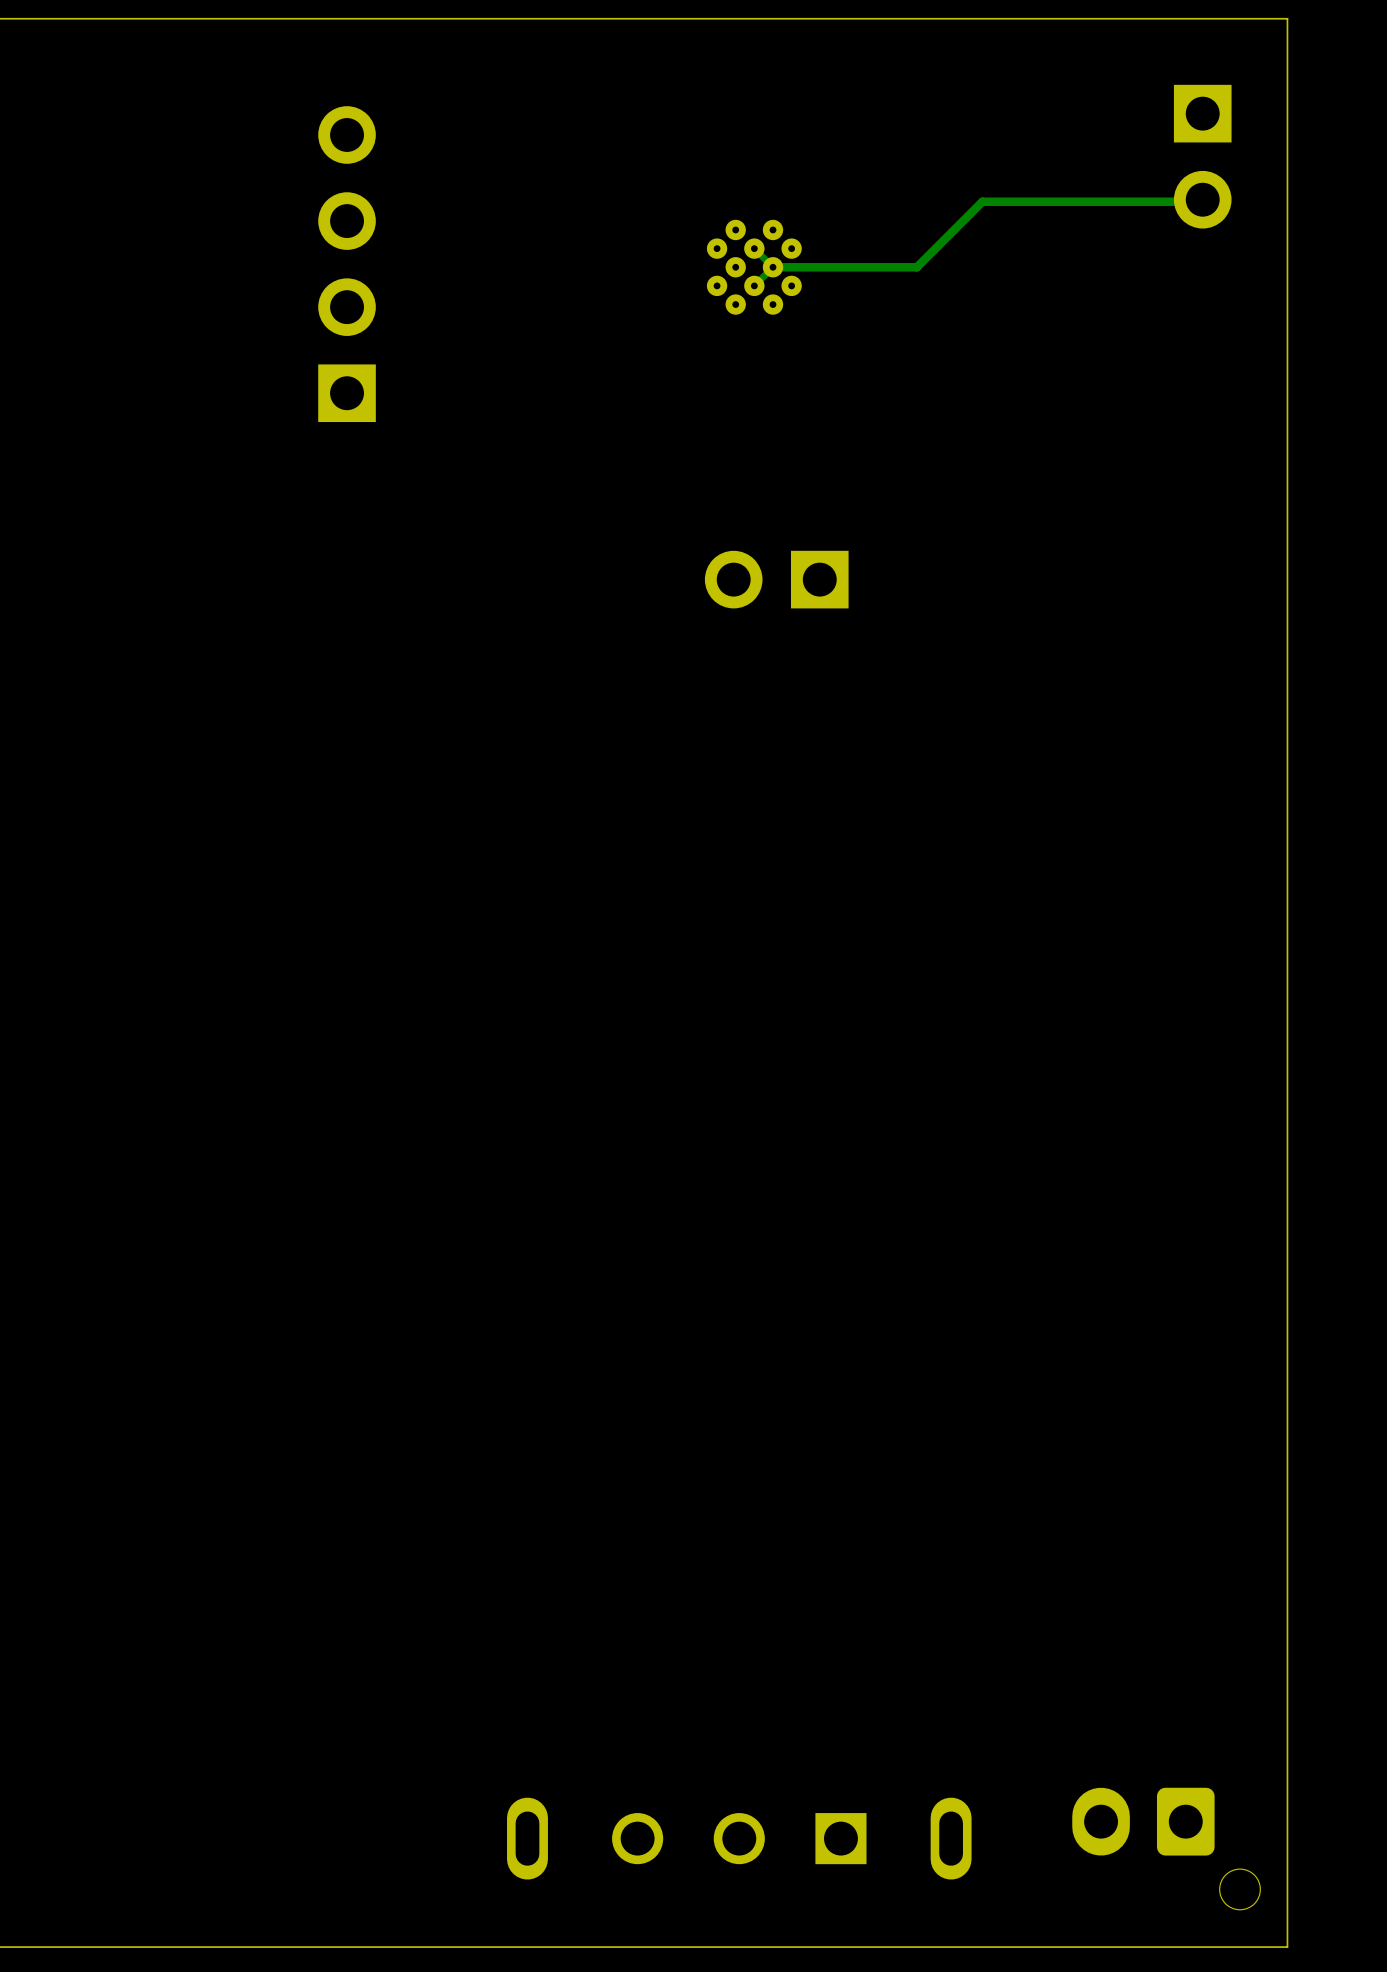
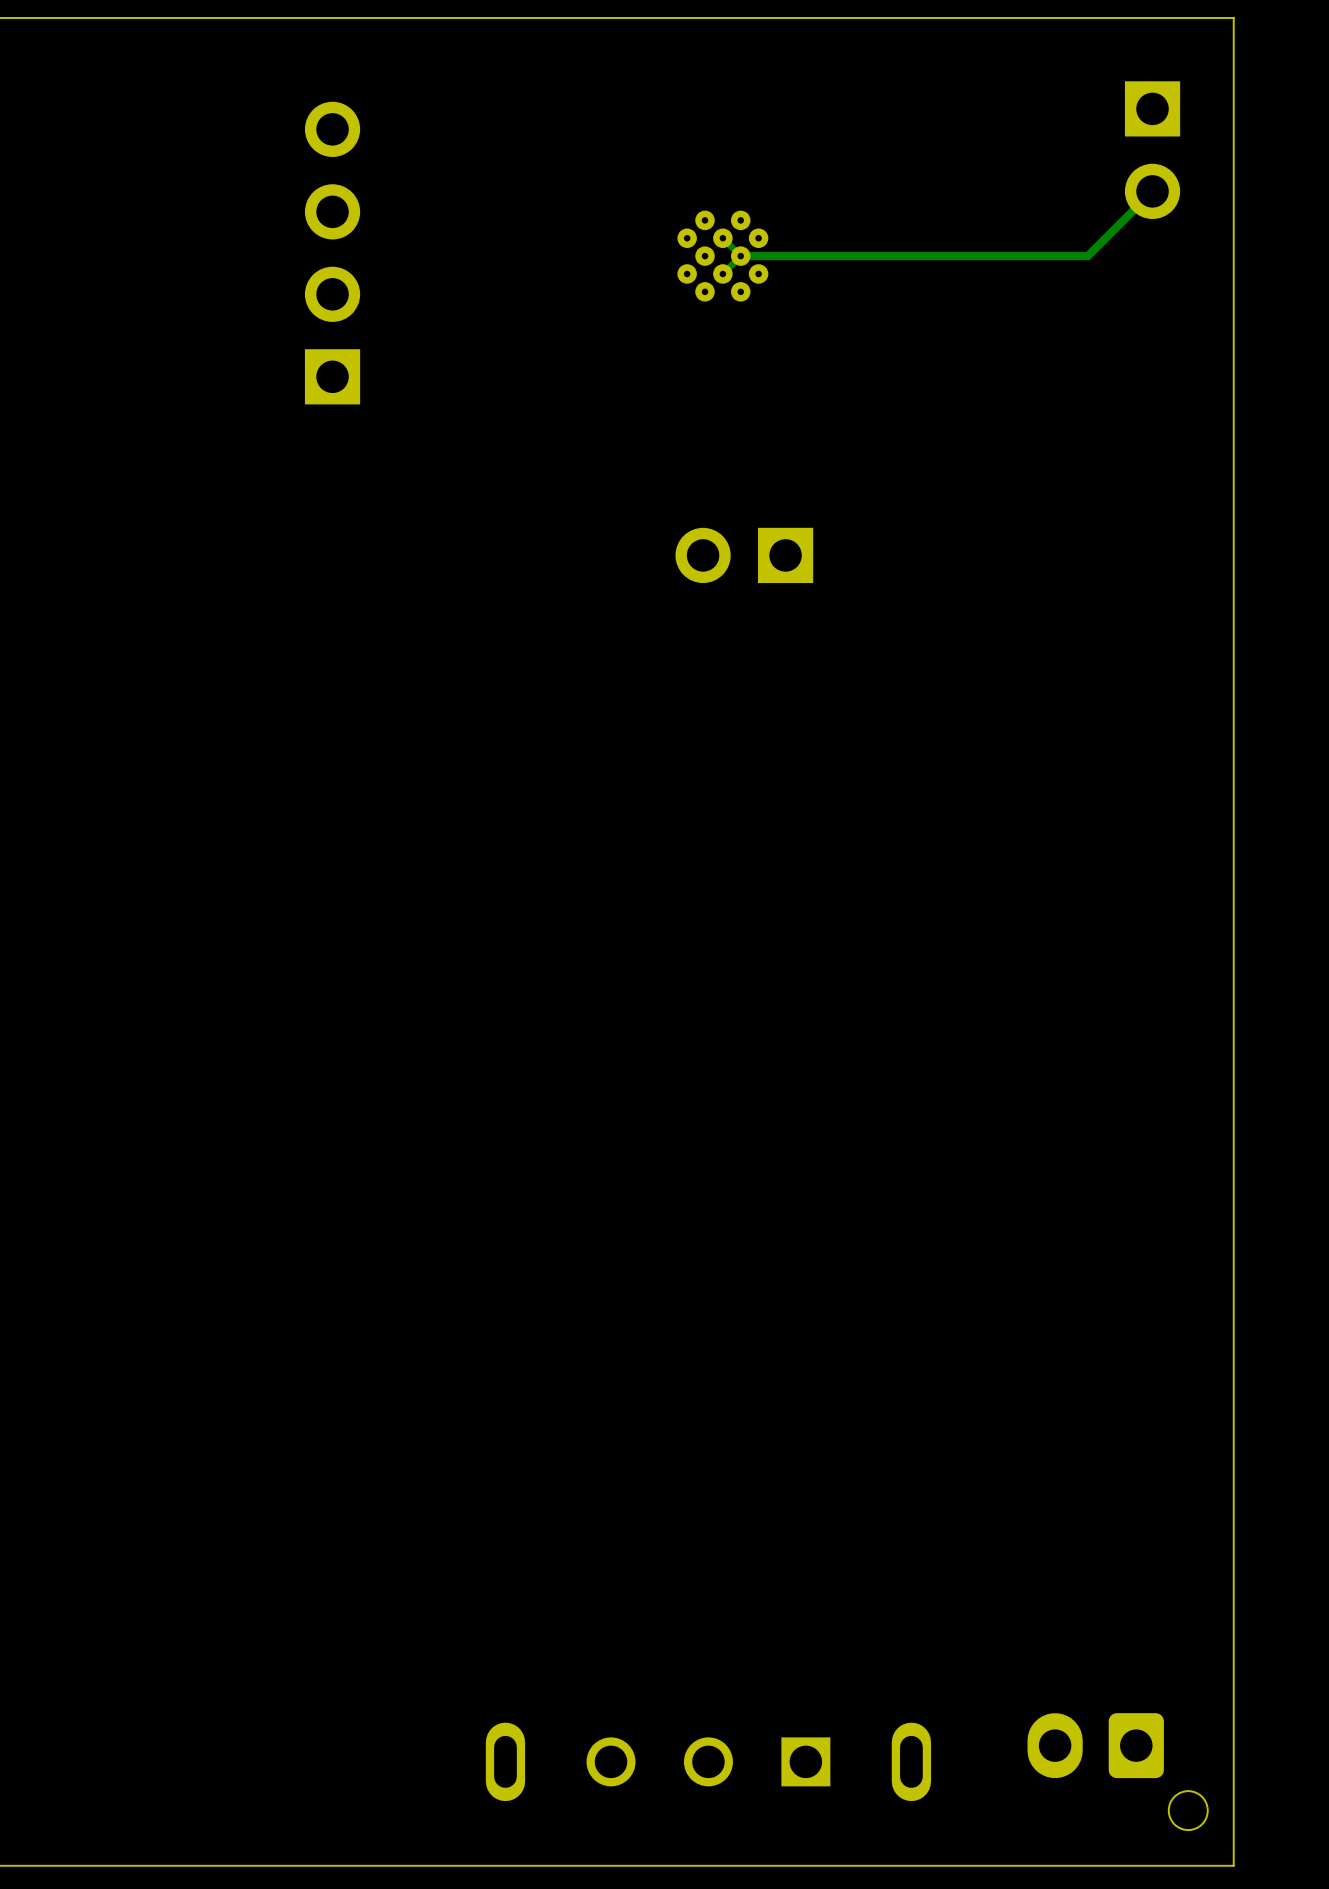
track: (1200, 201) (982, 201) (916, 267) -> (1150, 193) (1087, 256) (878, 256)

